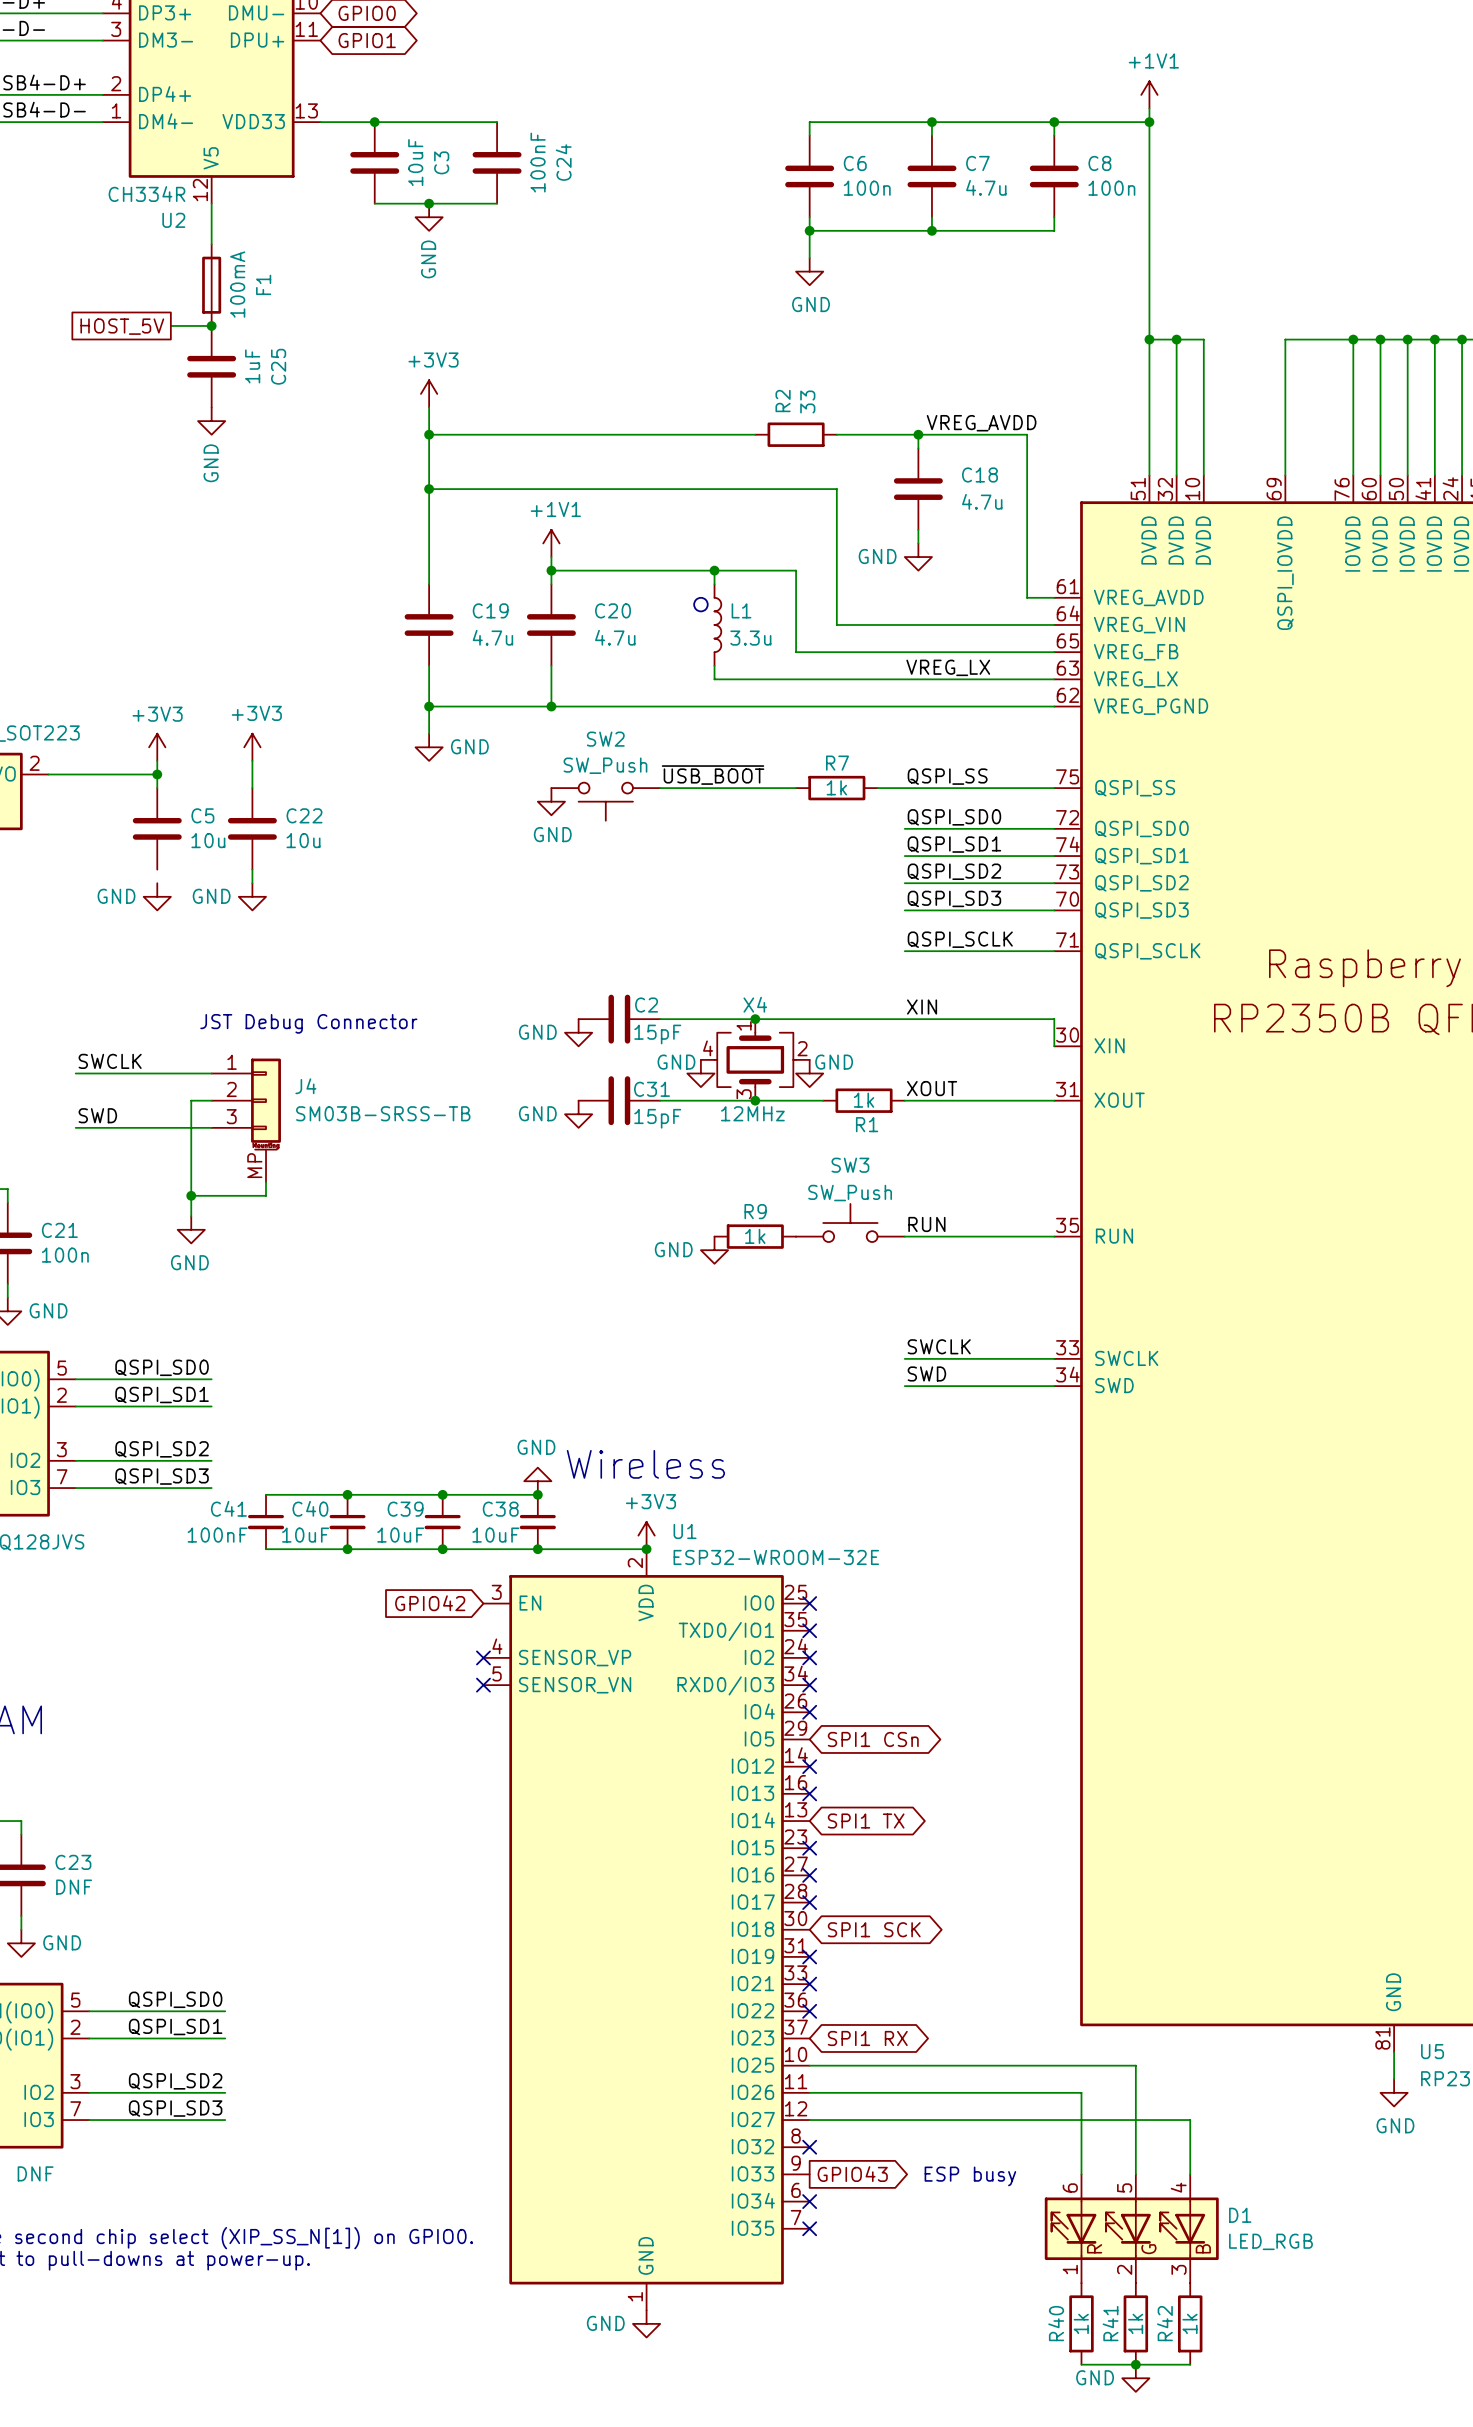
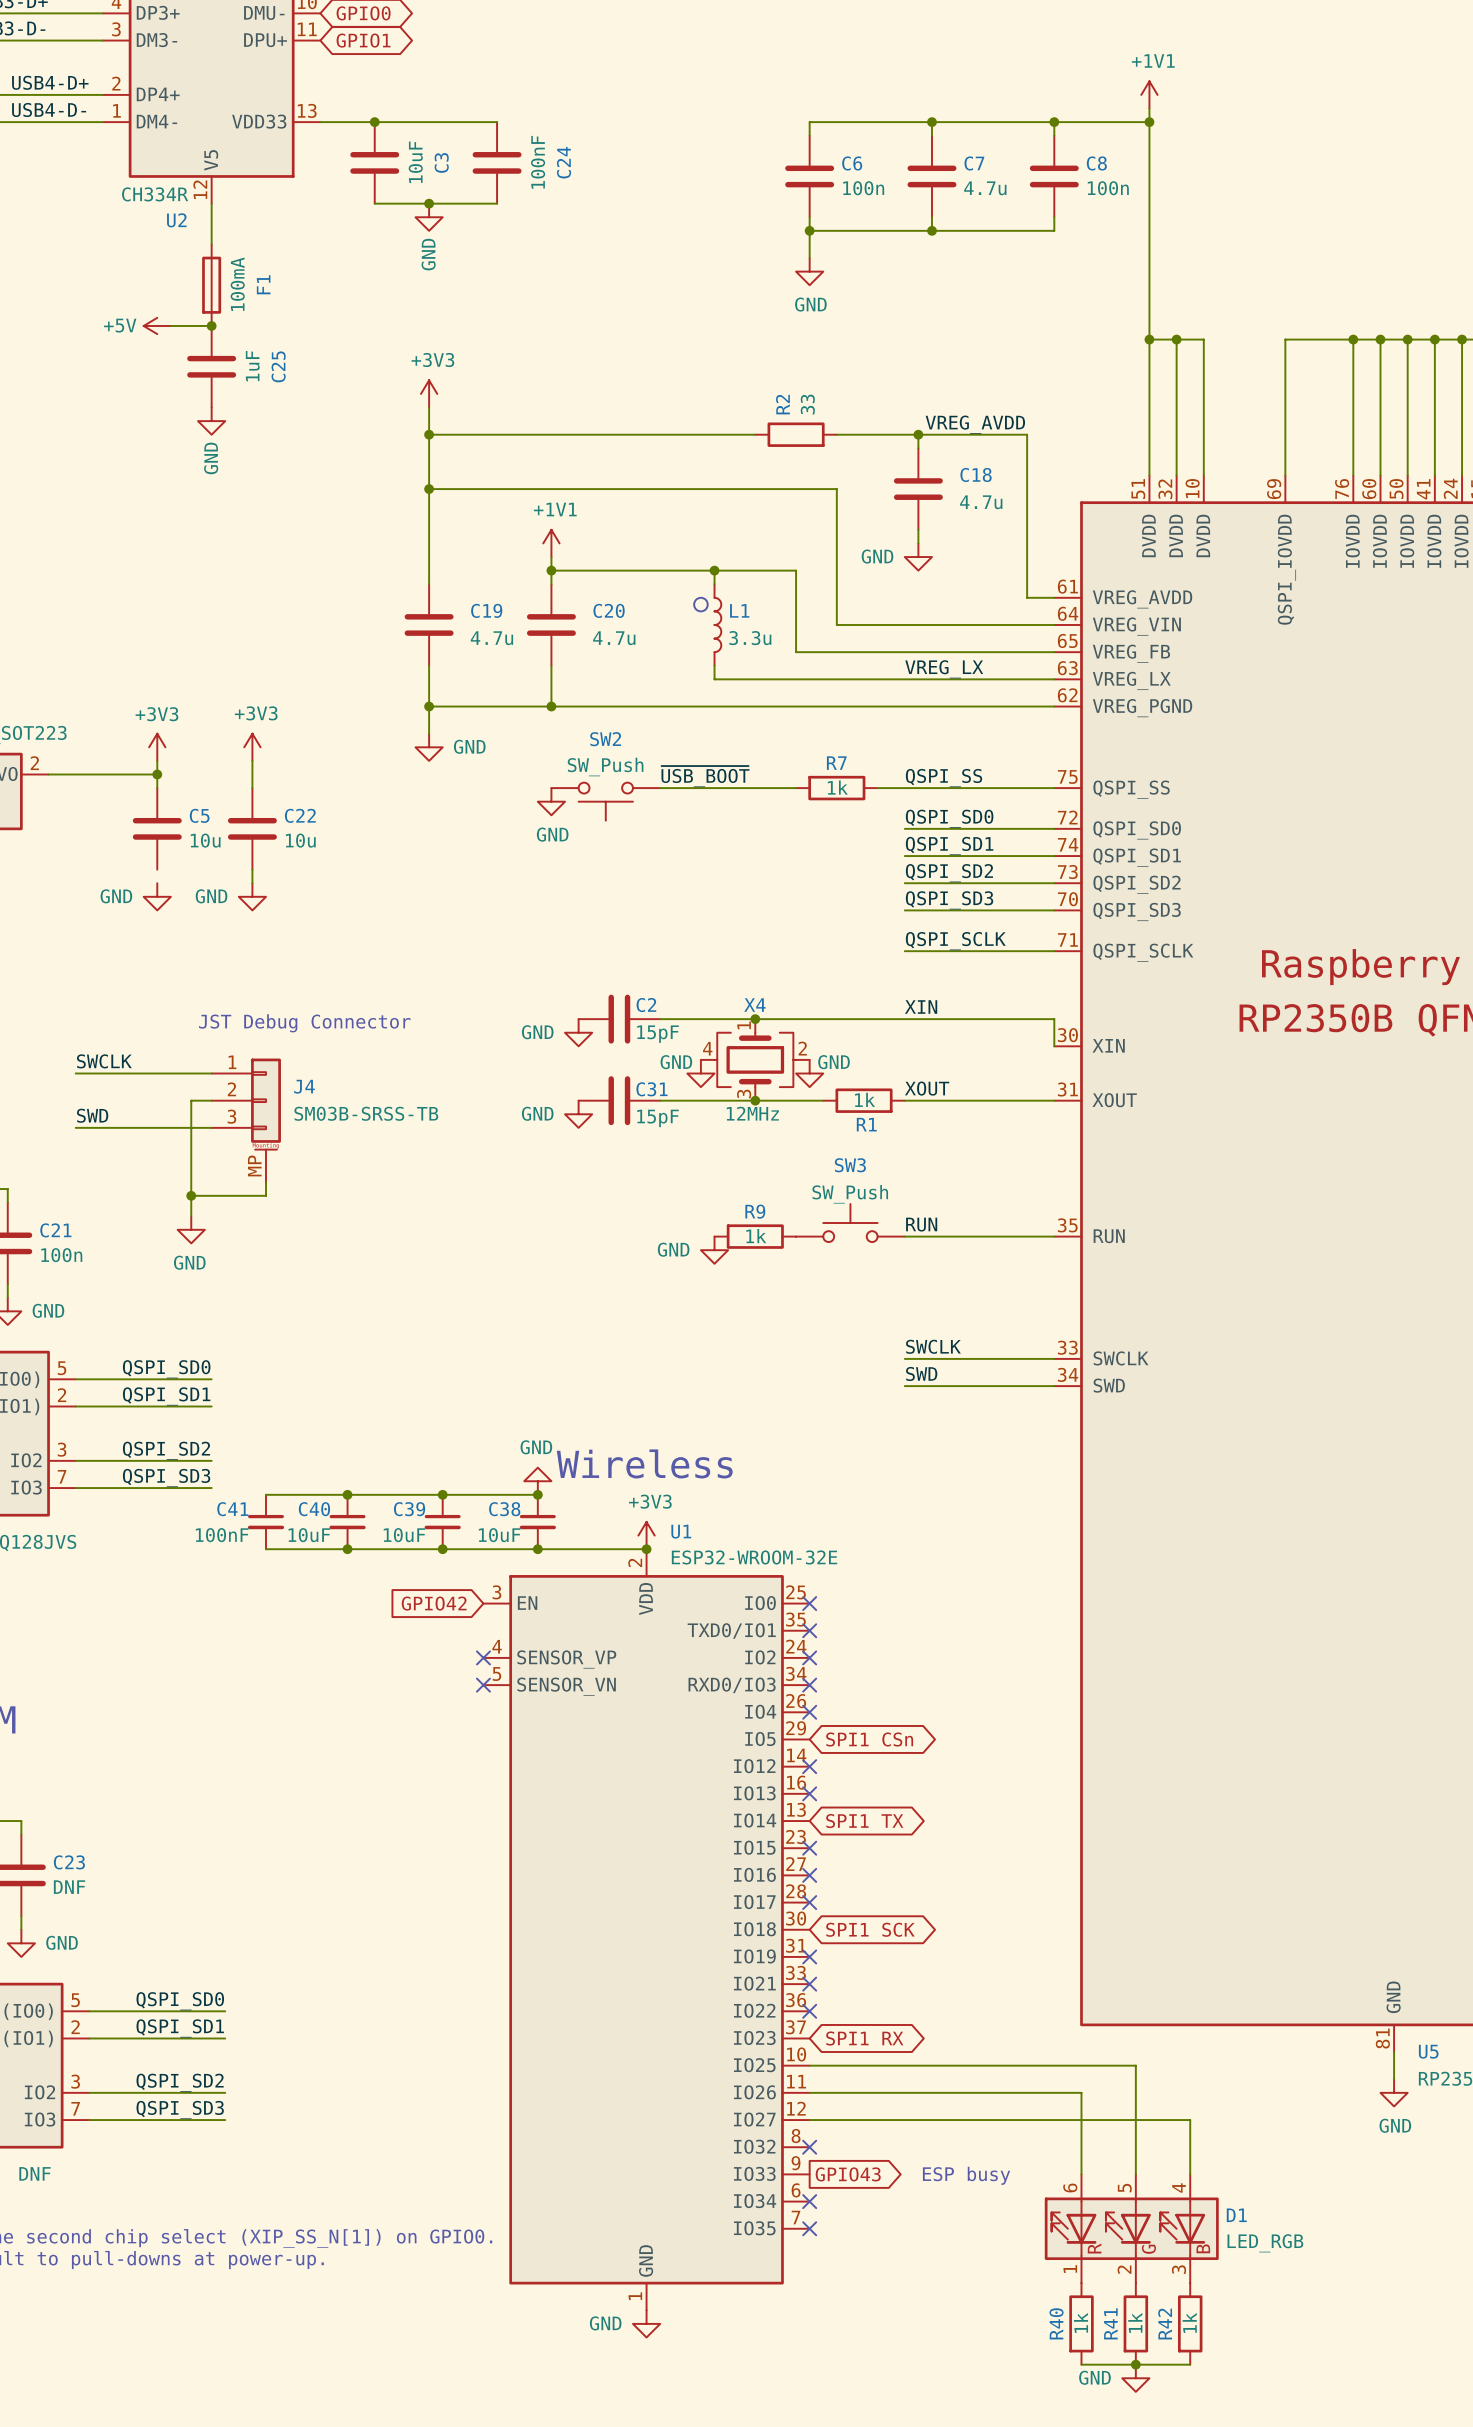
power symbol: none -> +5V (157, 325)
global label: HOST_5V (122, 326) -> none

